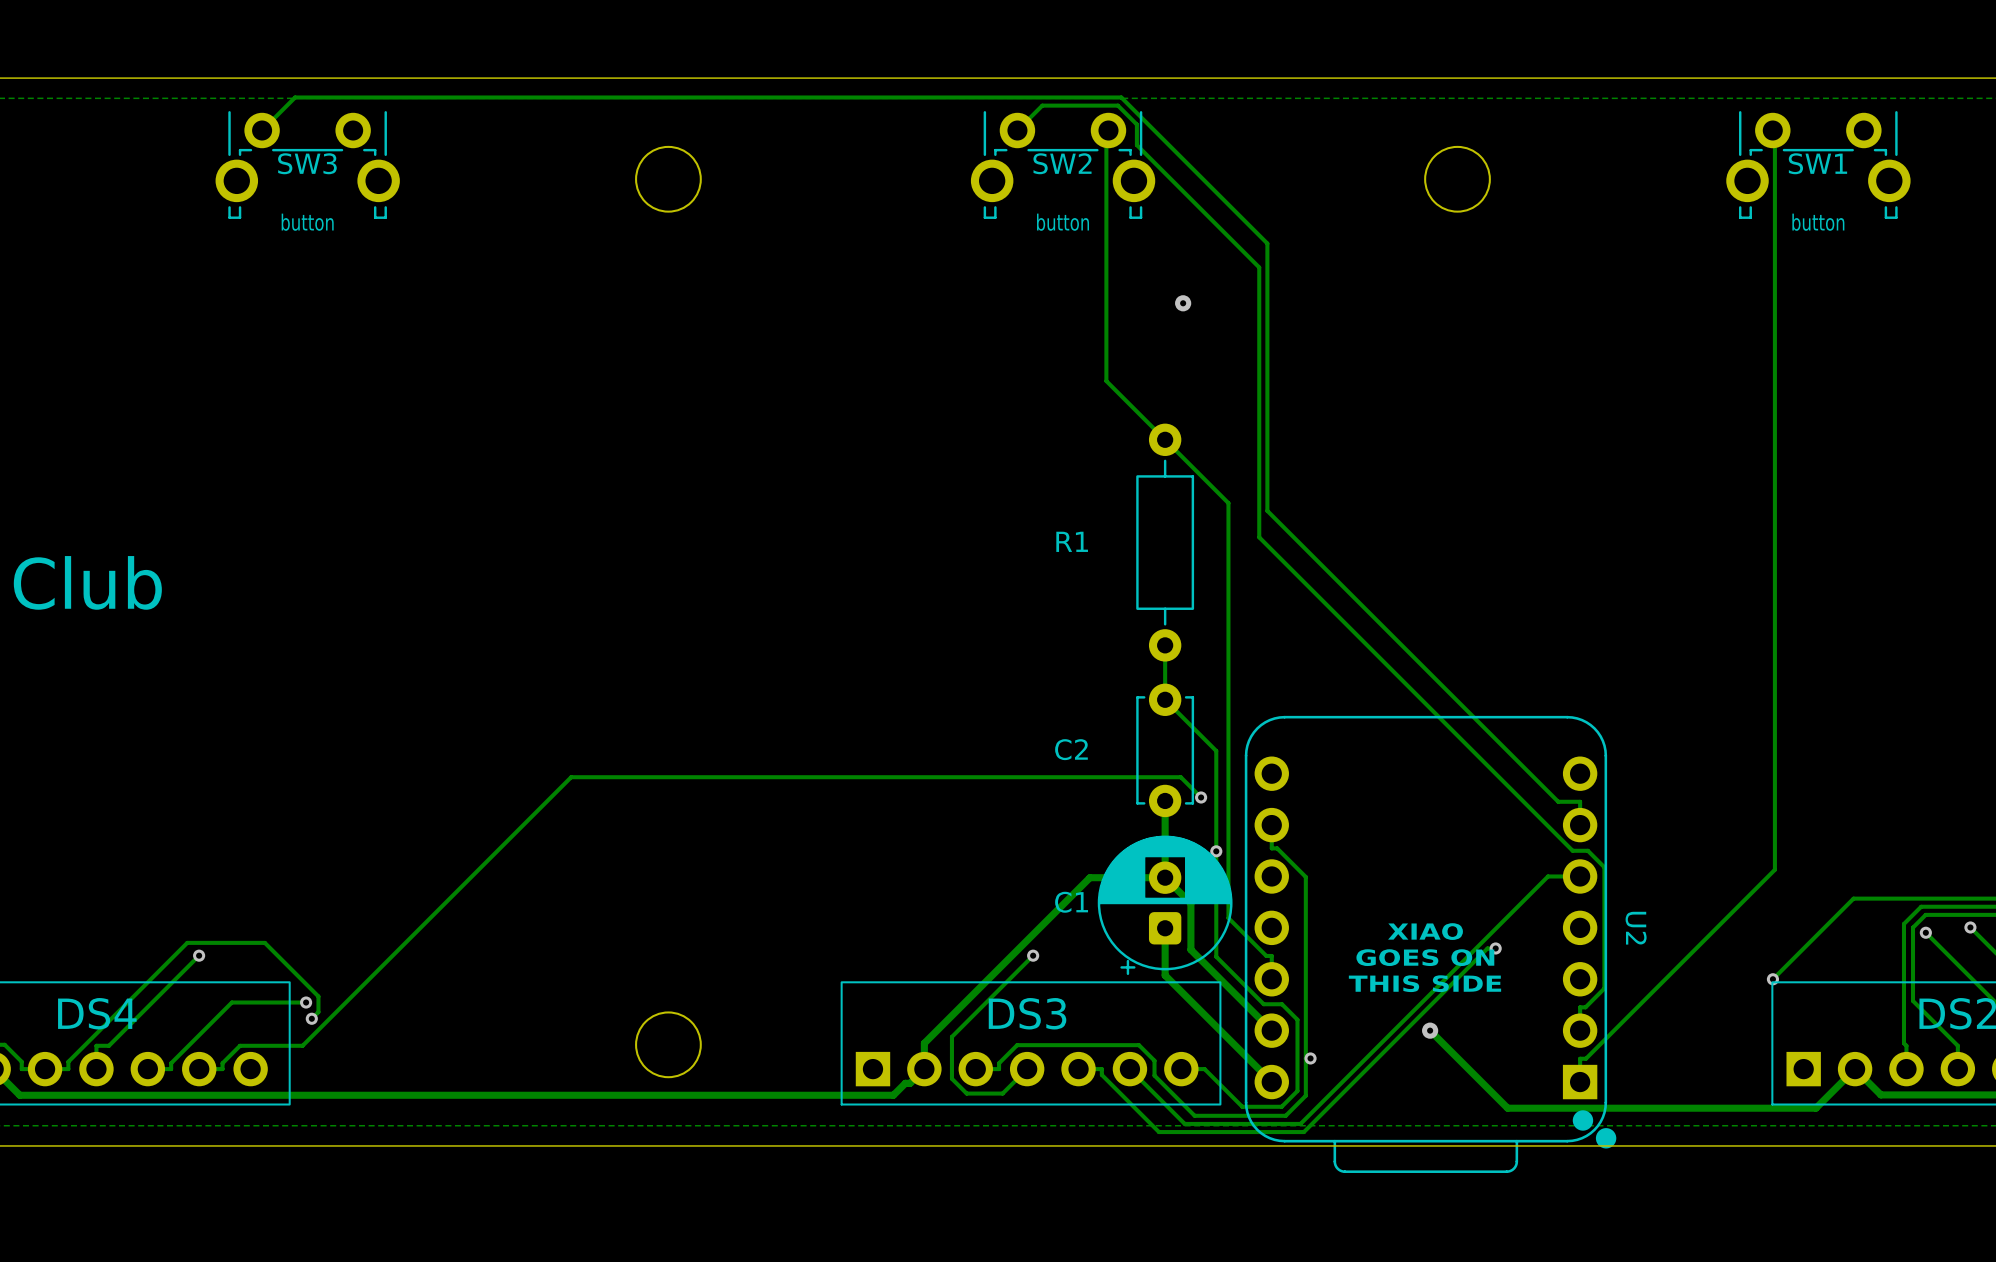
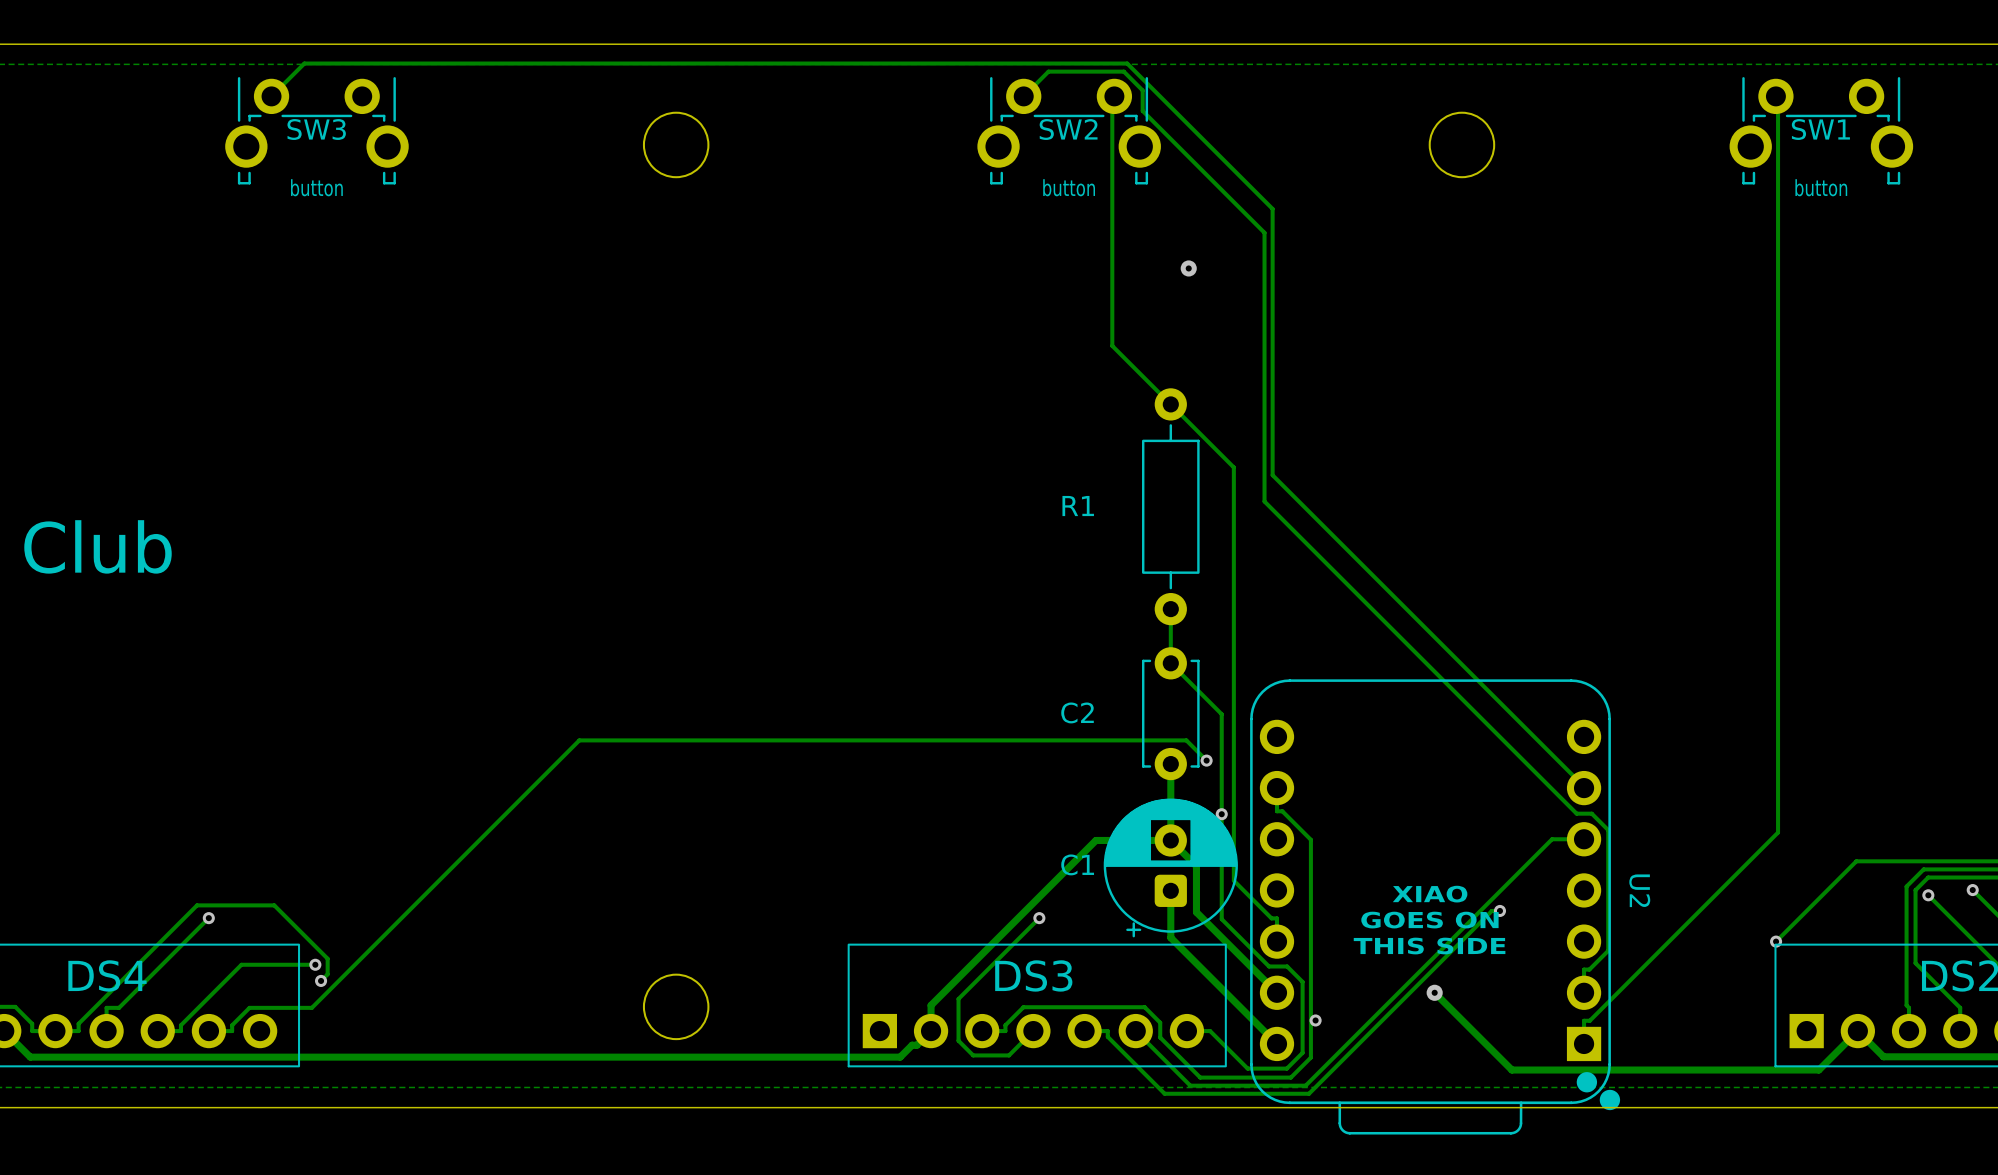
track: (1558, 801) (1580, 801) (1580, 823) -> (1562, 764) (1584, 786)

